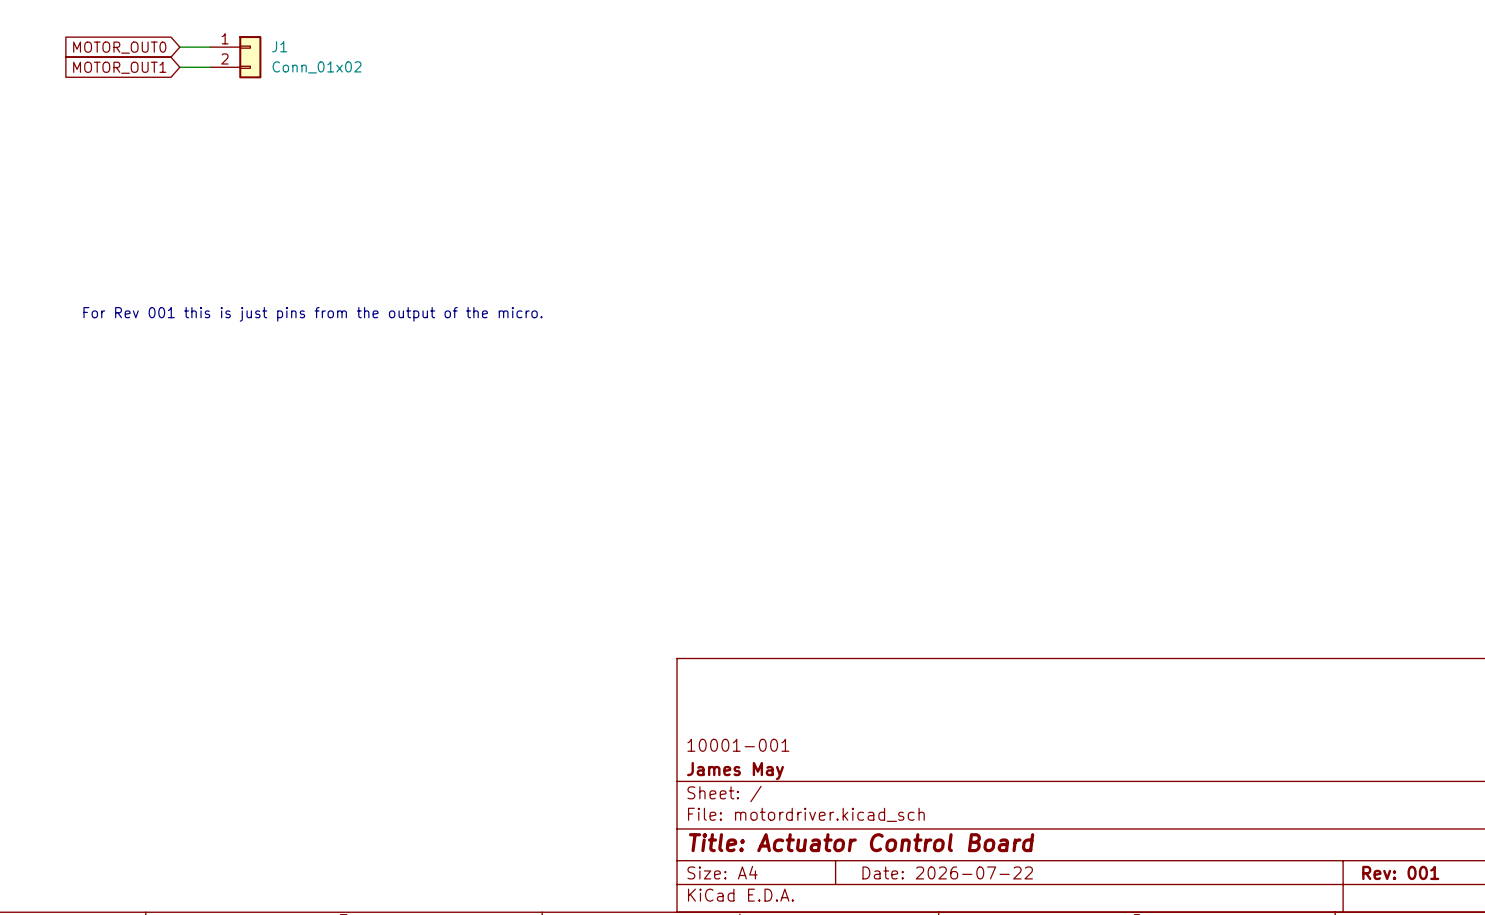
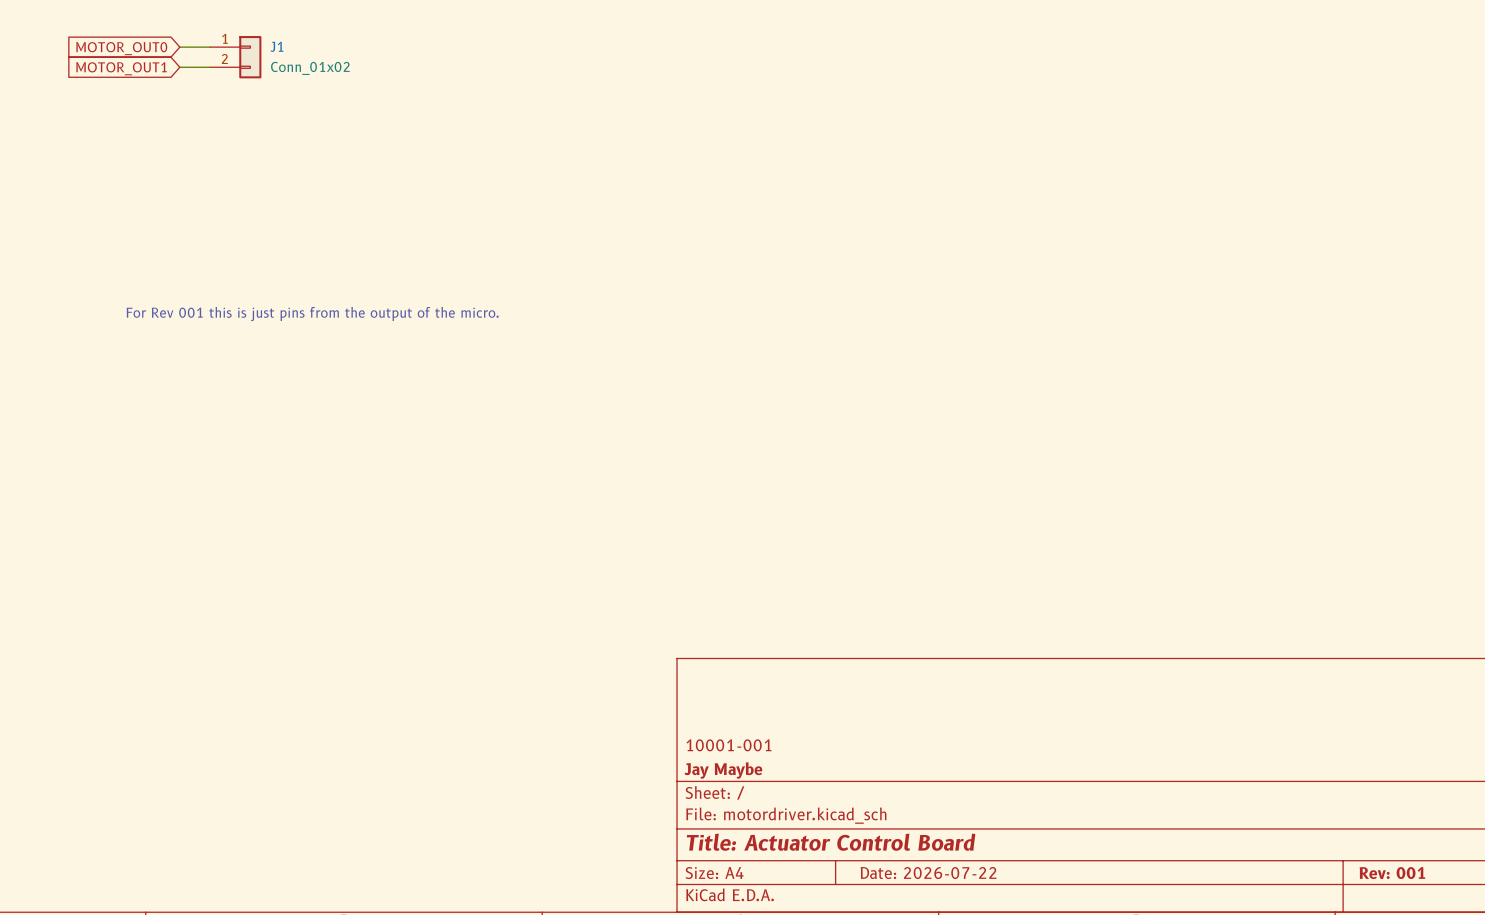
title block: James May (735, 771) -> Jay Maybe (723, 770)

